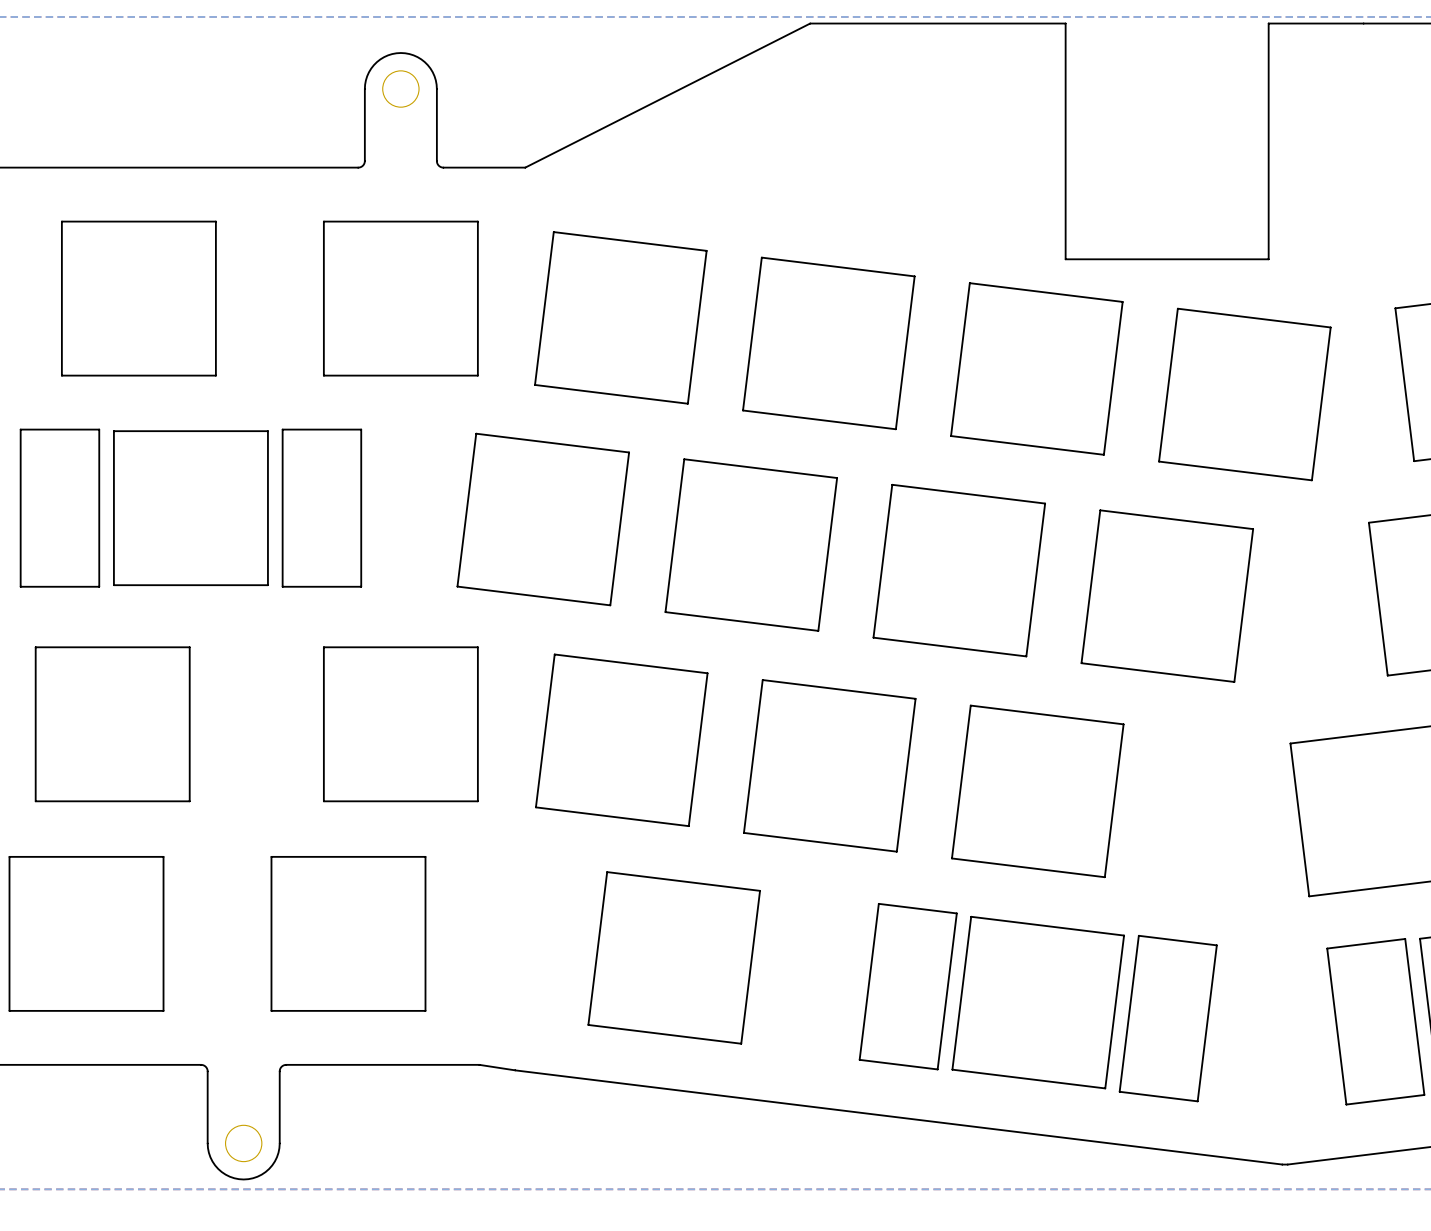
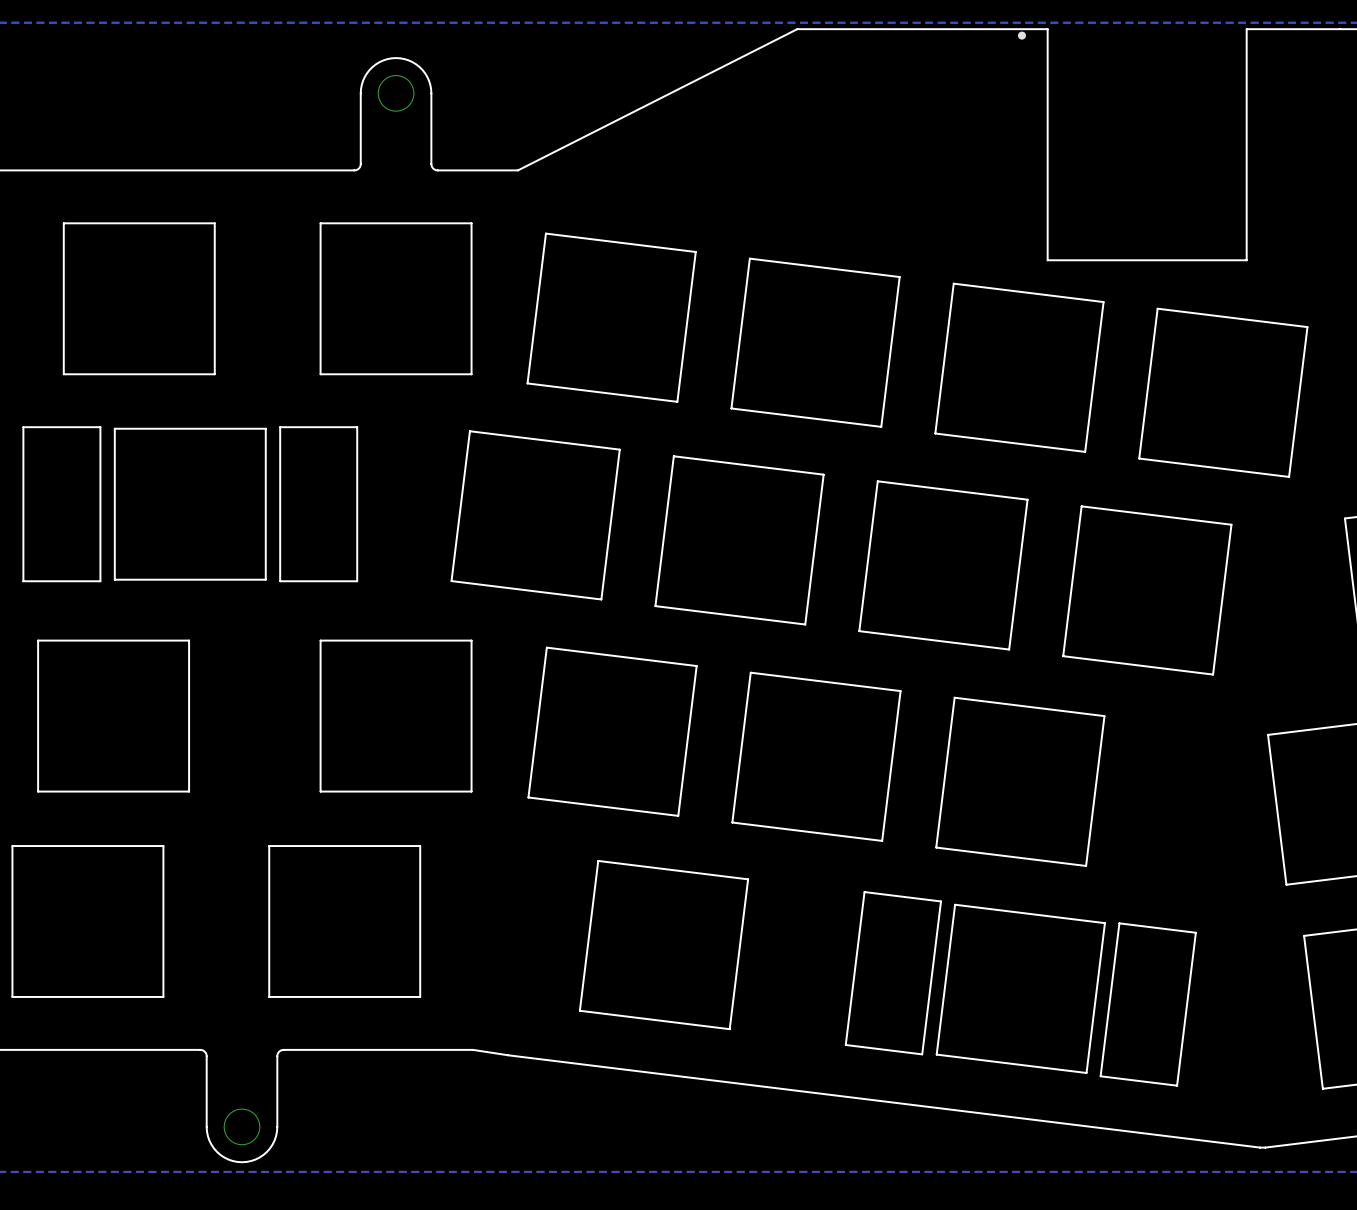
drawing: none -> [1017, 31, 1027, 40]

